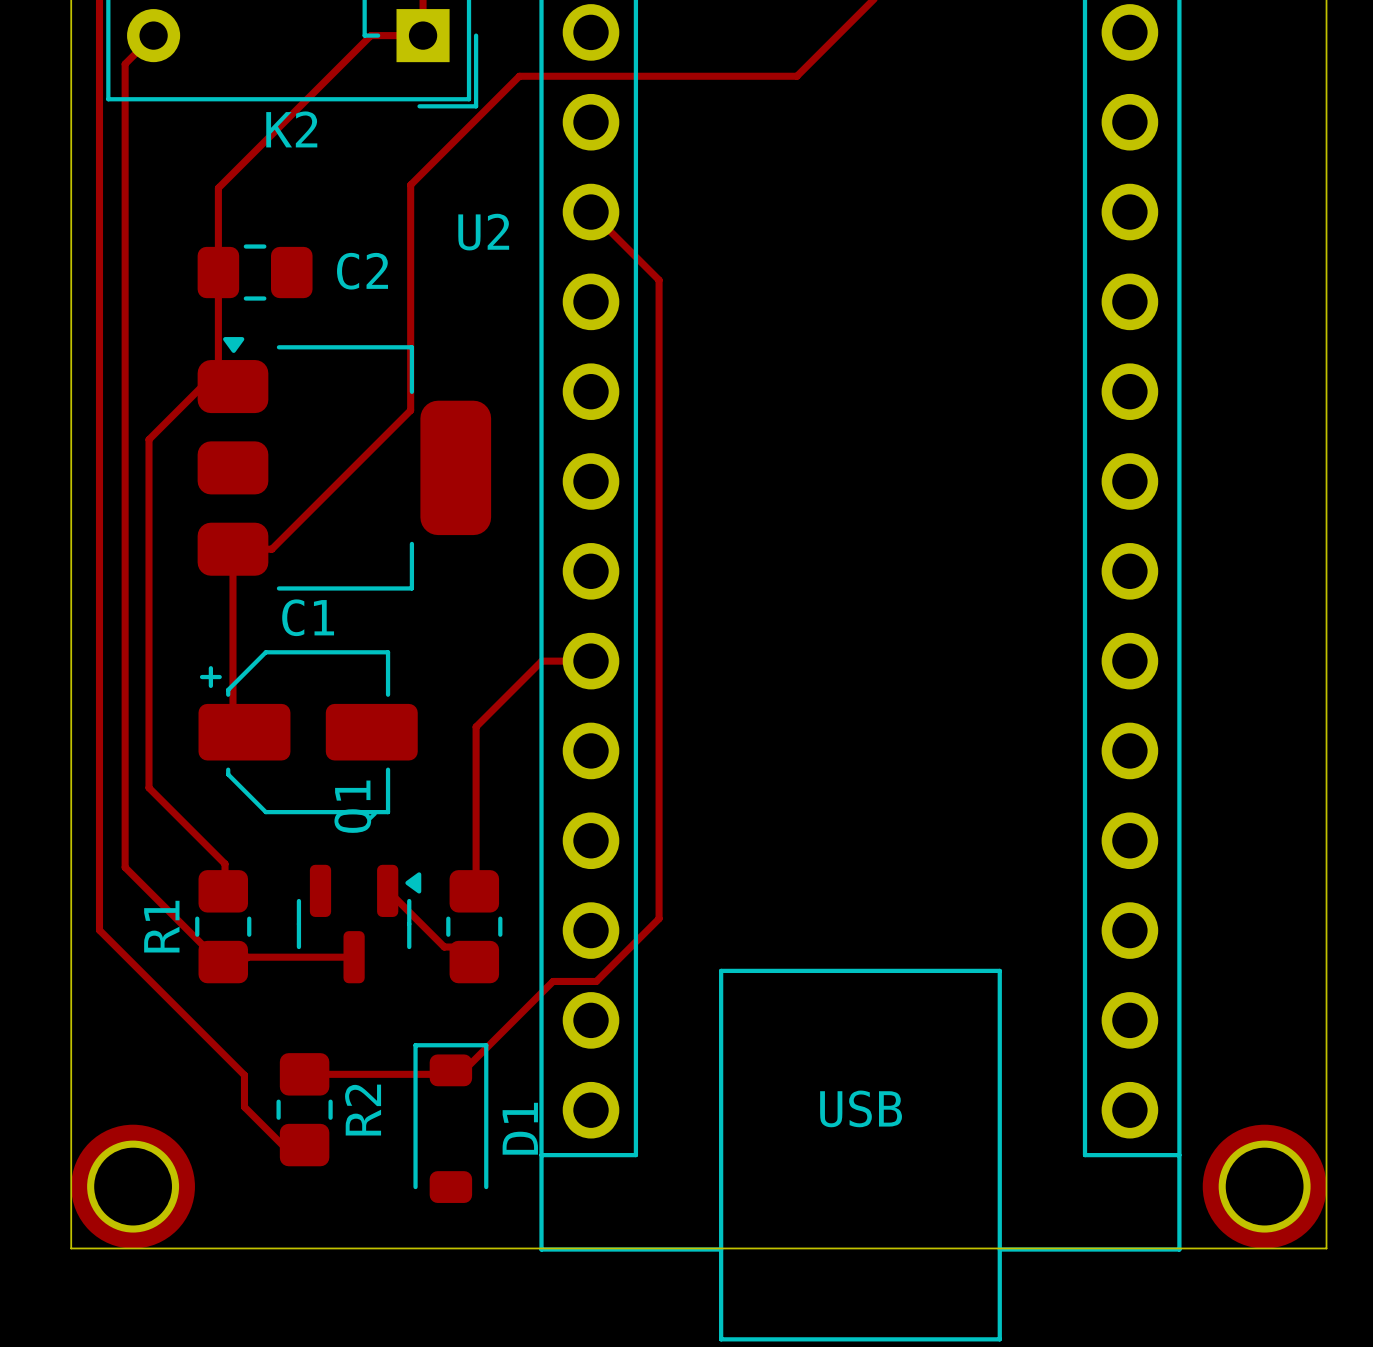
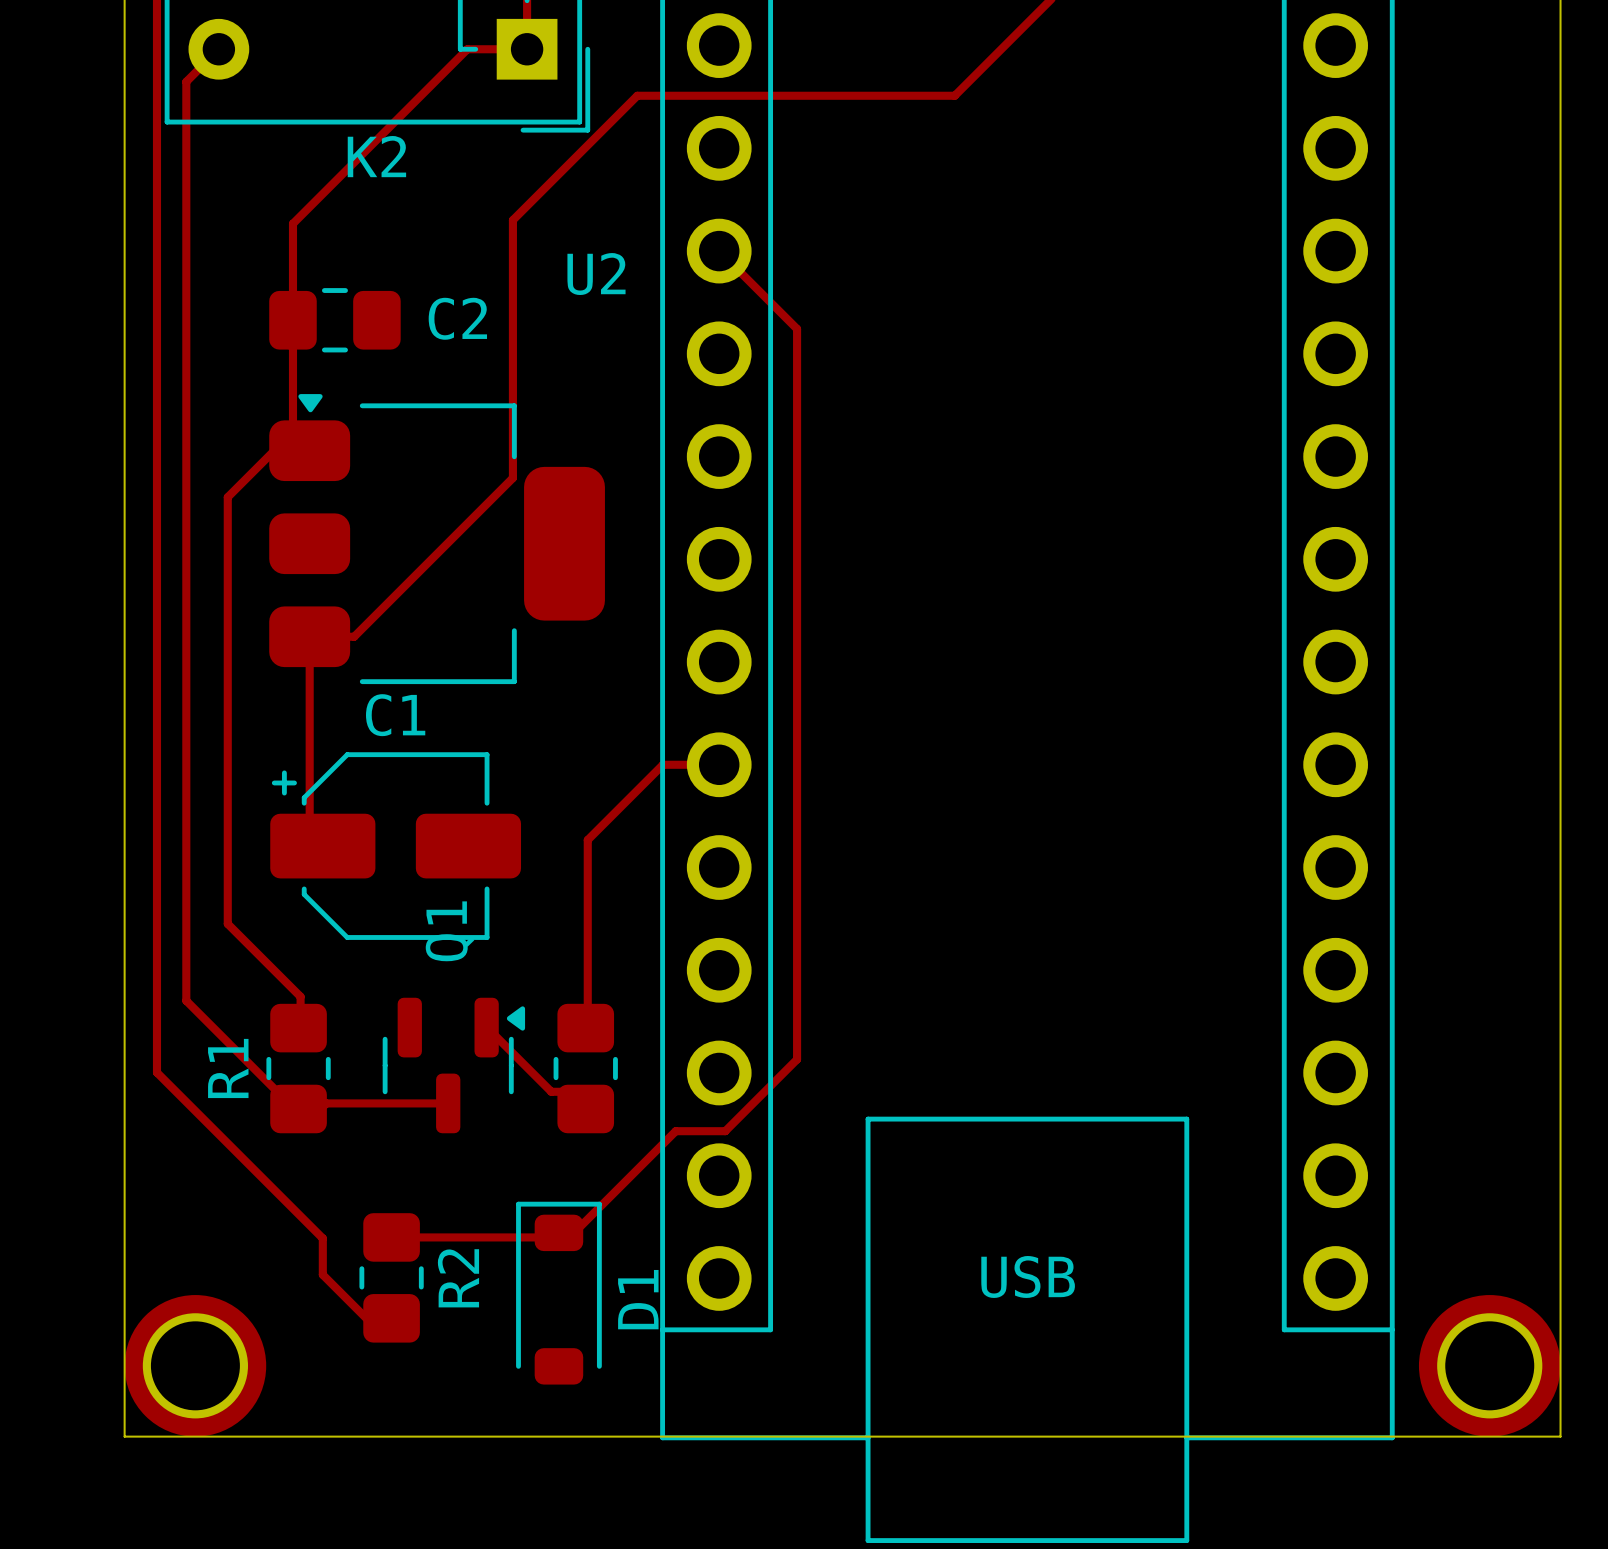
top track: (161, 427) (149, 439) (149, 787) (161, 800) -> (227, 497) (227, 923)

